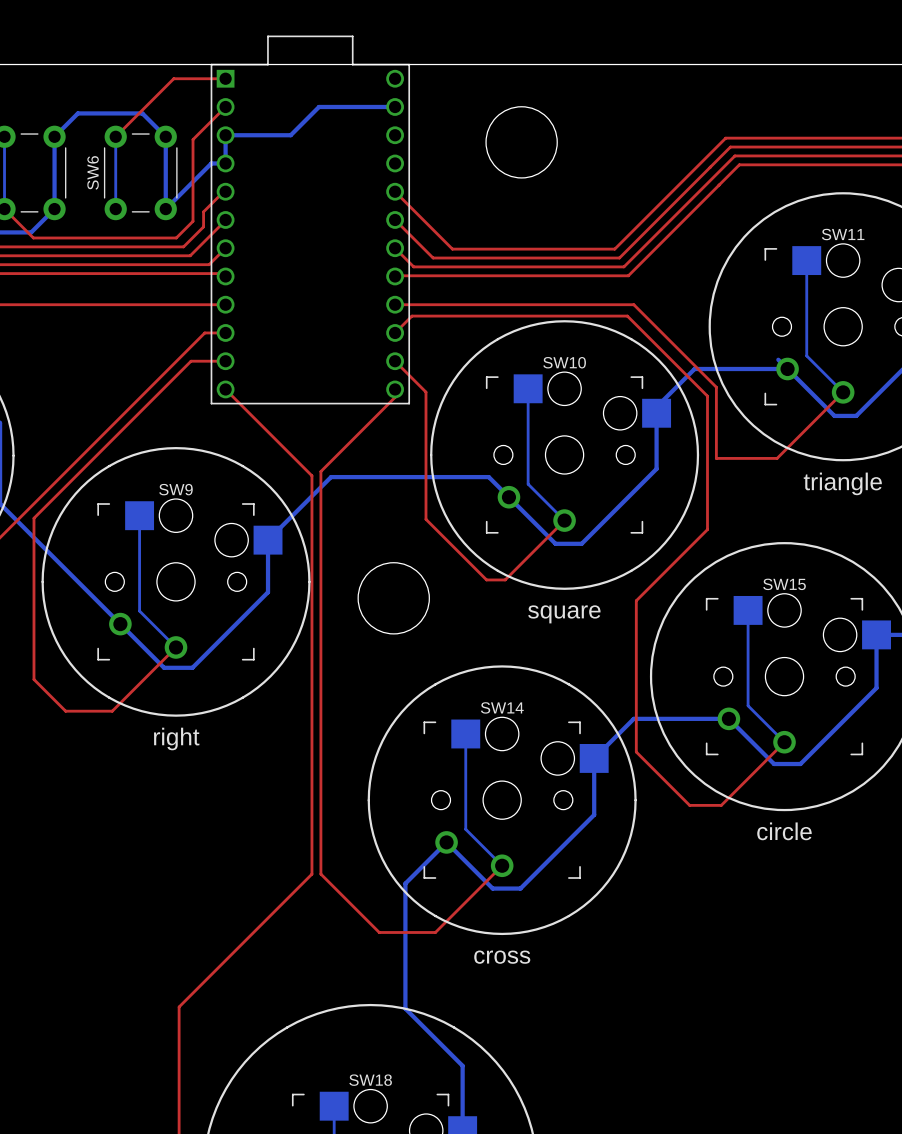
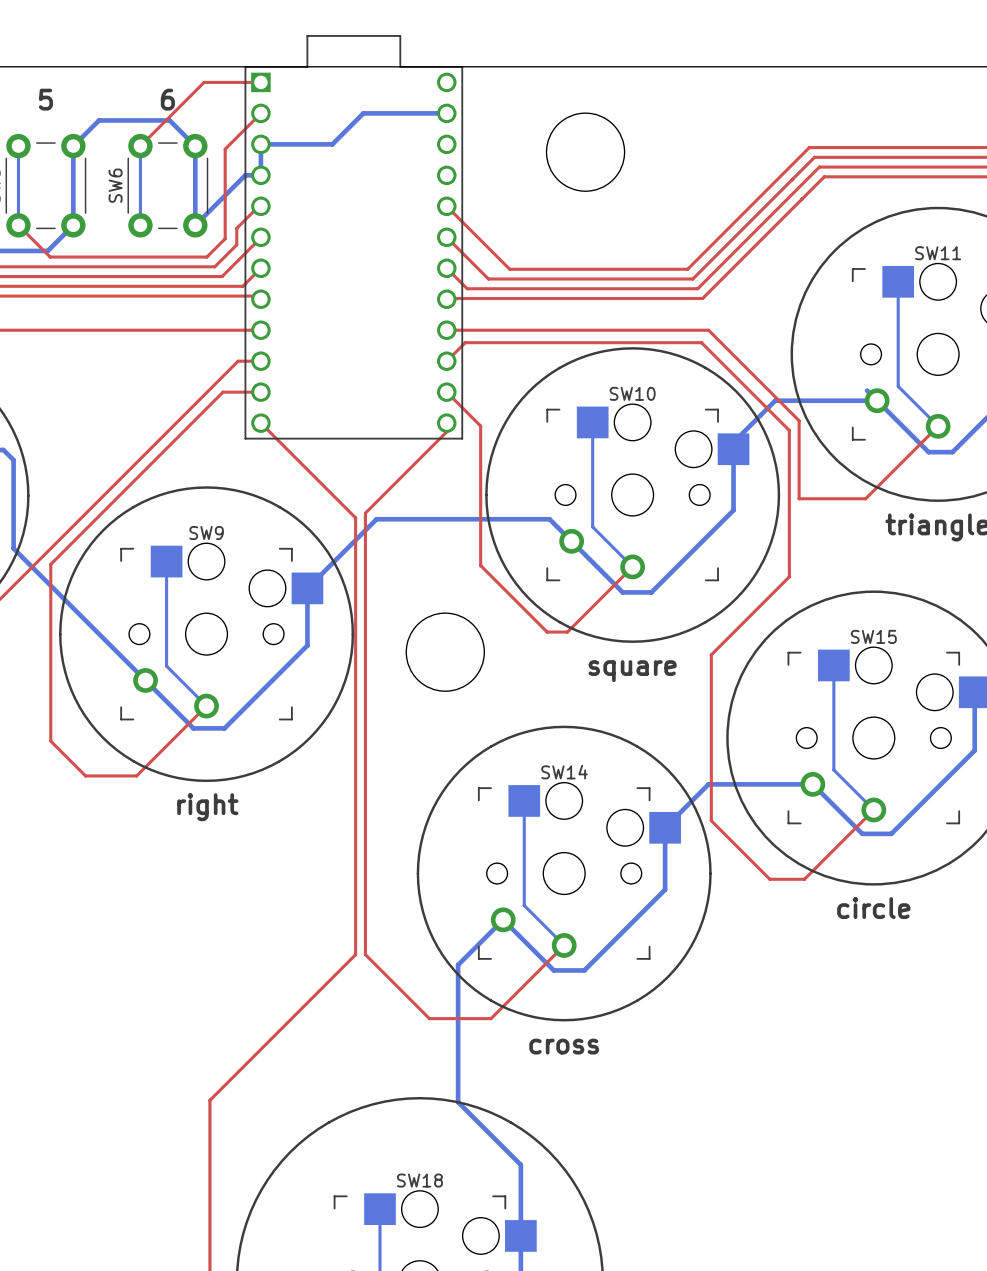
text: none -> 5 (45, 99)
text: none -> 6 (167, 99)

